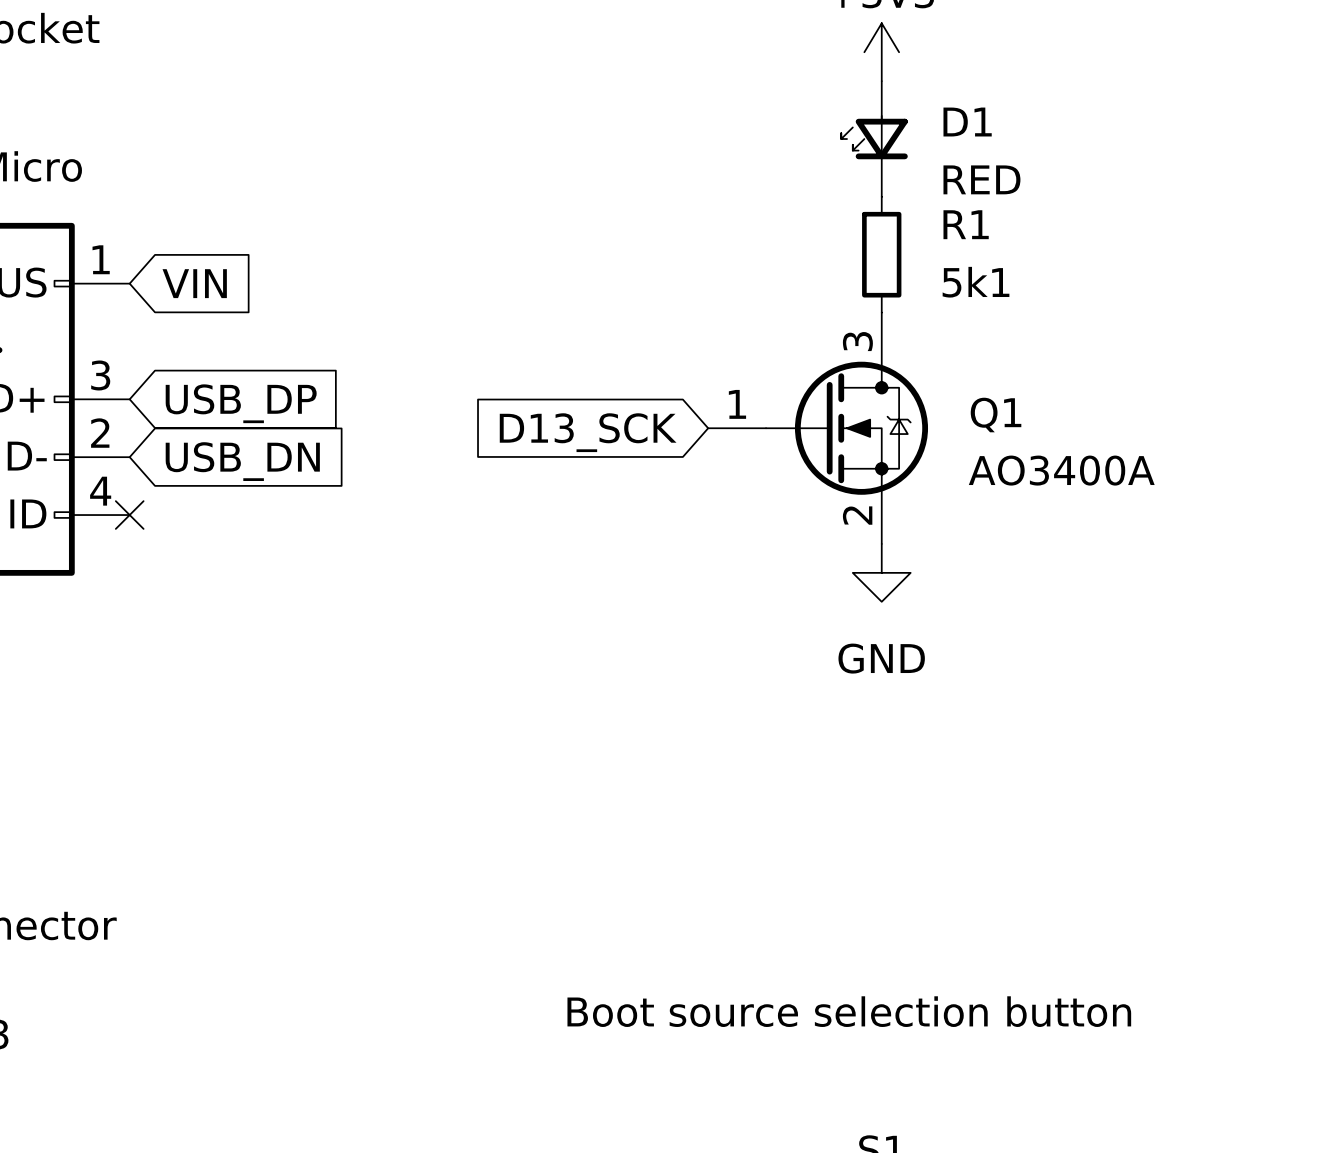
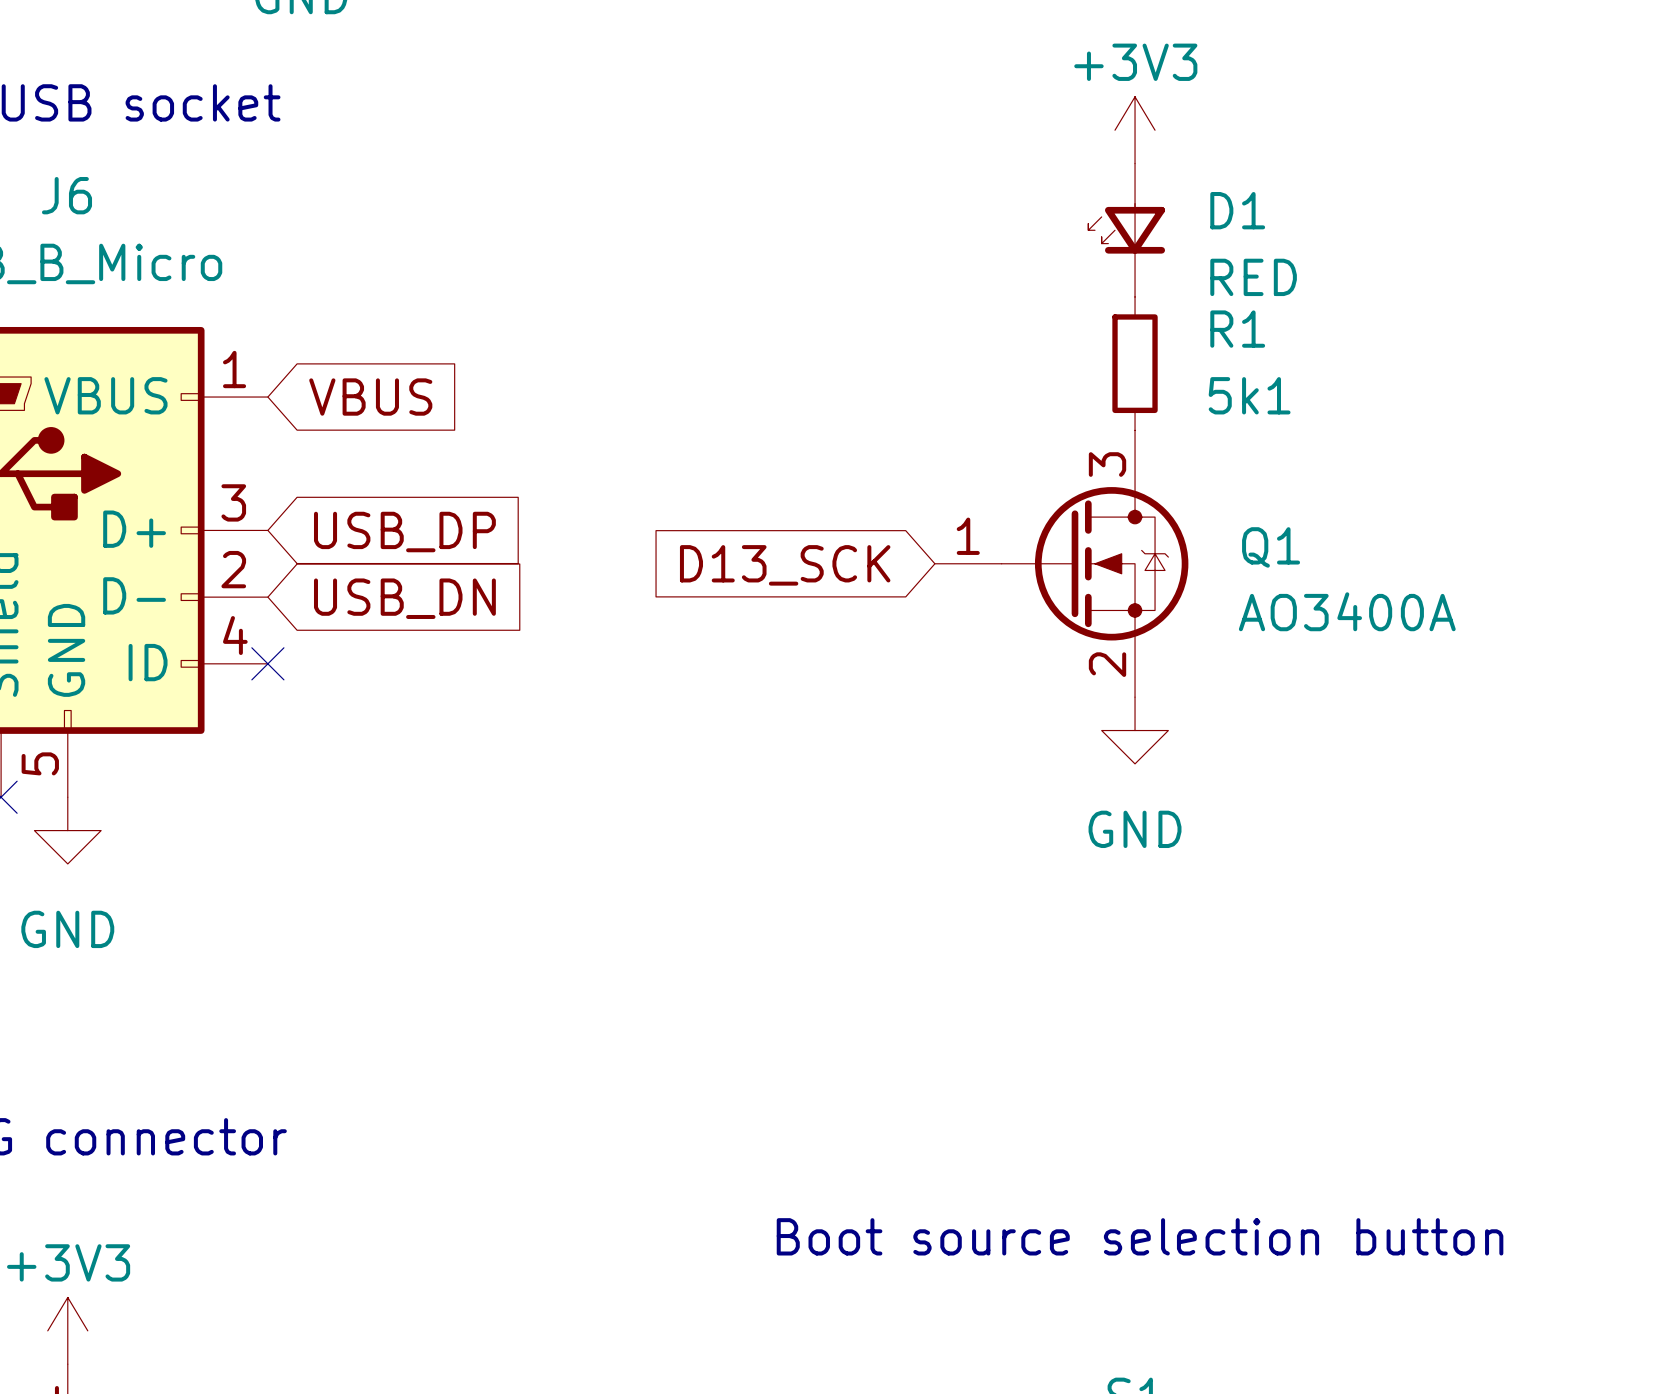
global label: VIN (194, 283) -> VBUS (370, 397)

